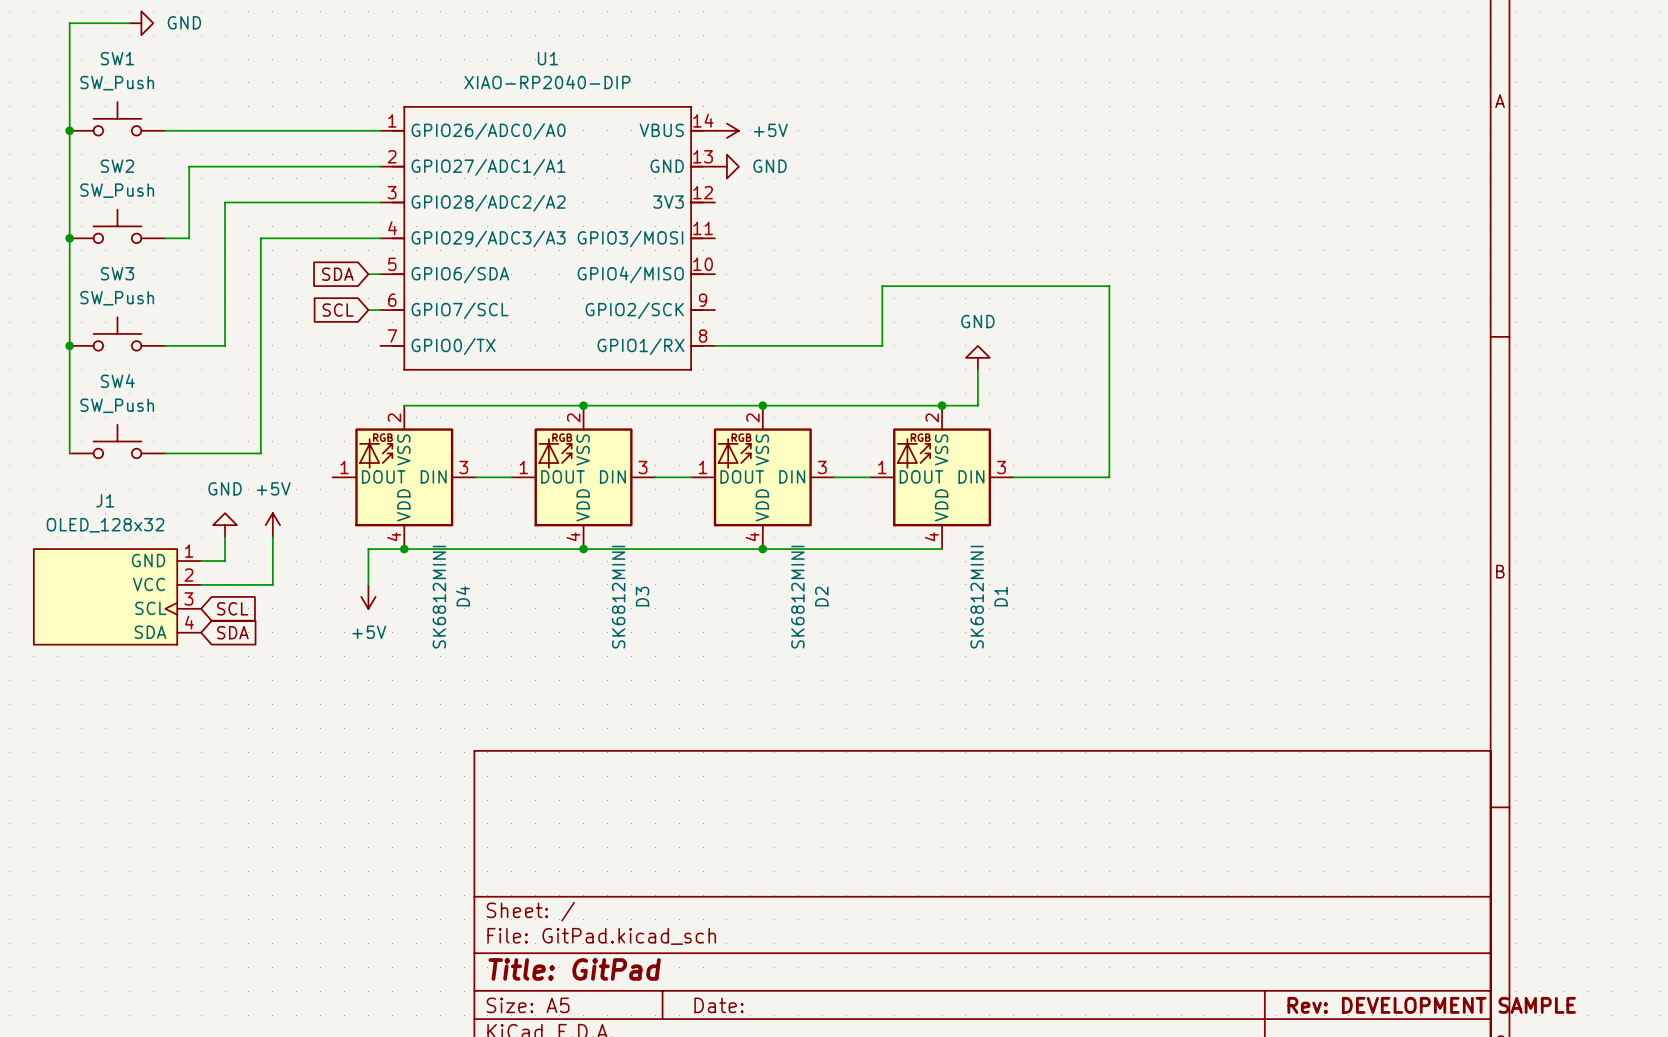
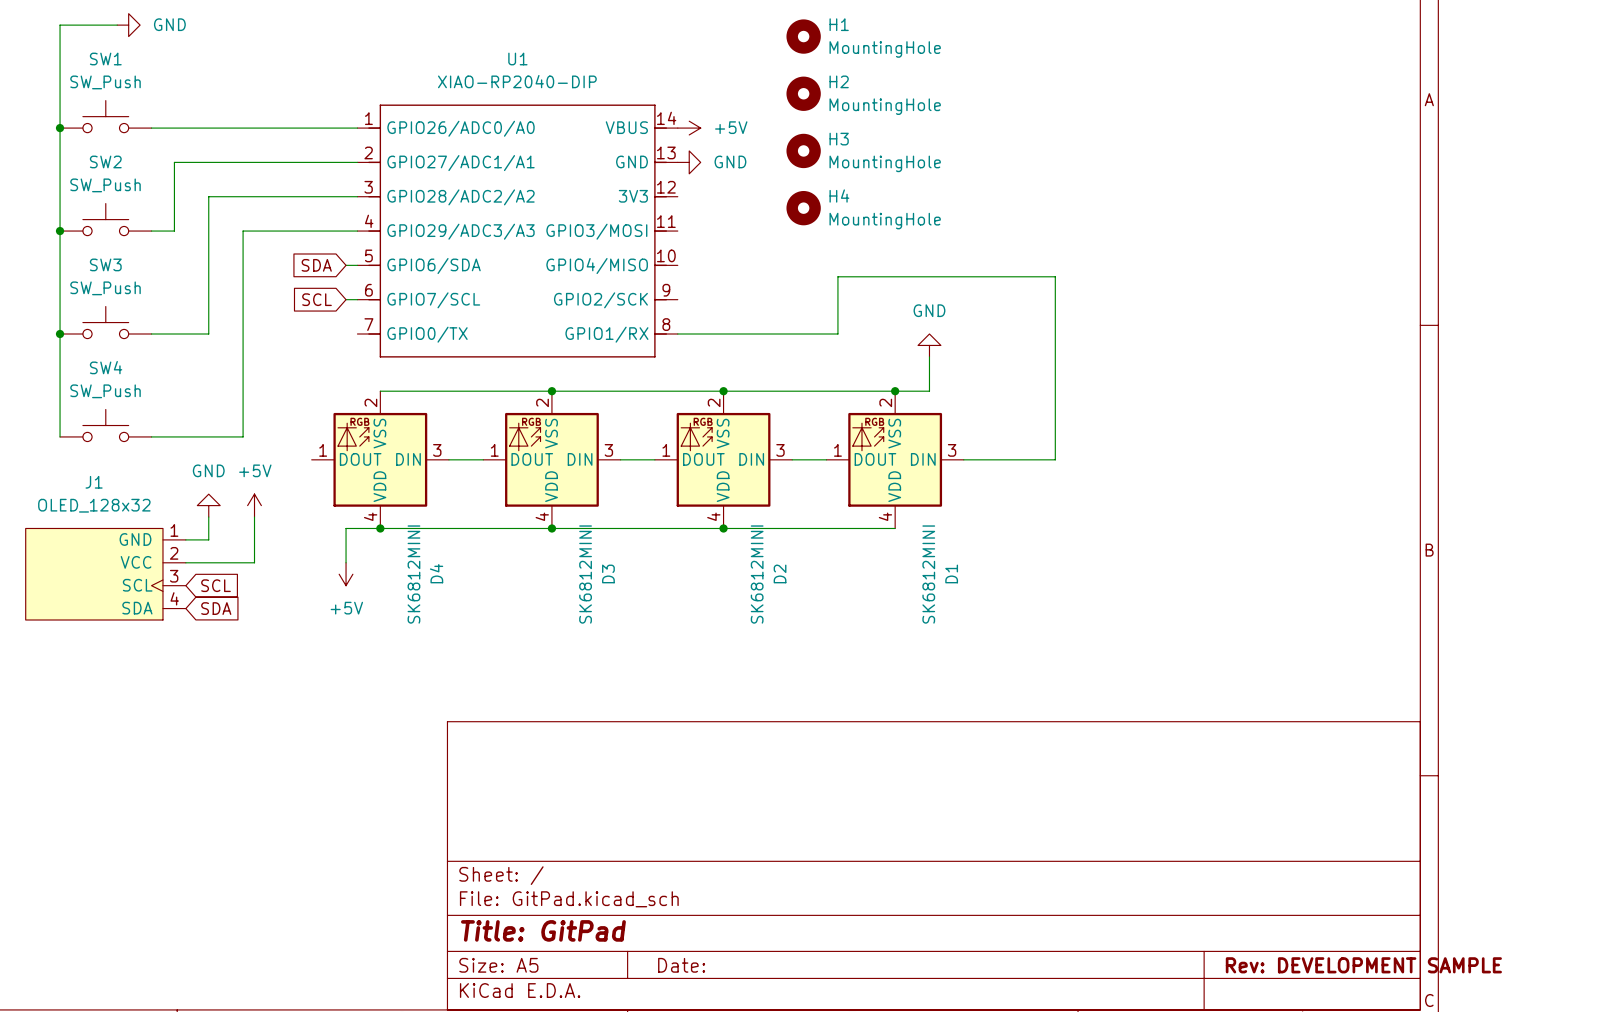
H1: none -> MountingHole (803, 36)
H2: none -> MountingHole (803, 93)
H3: none -> MountingHole (803, 150)
H4: none -> MountingHole (803, 208)

